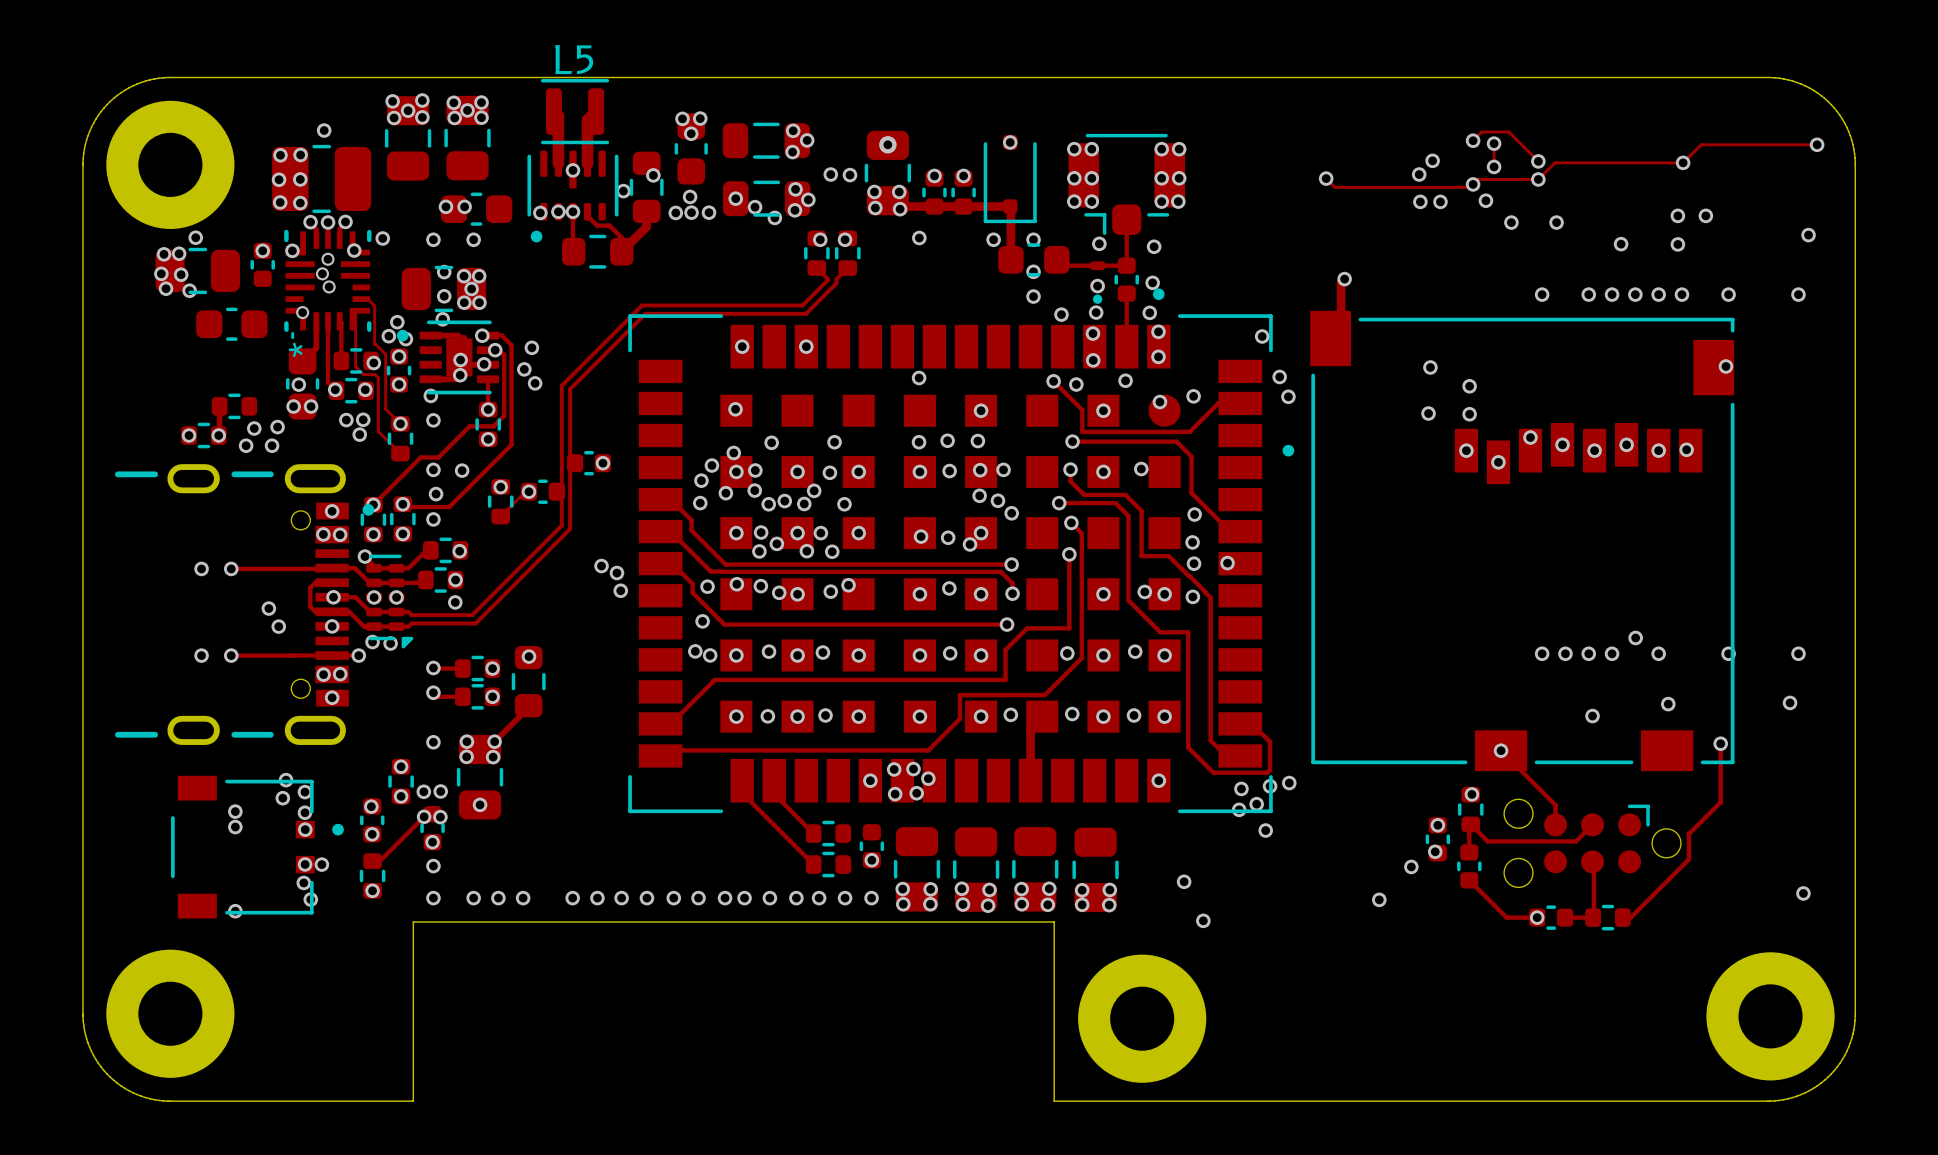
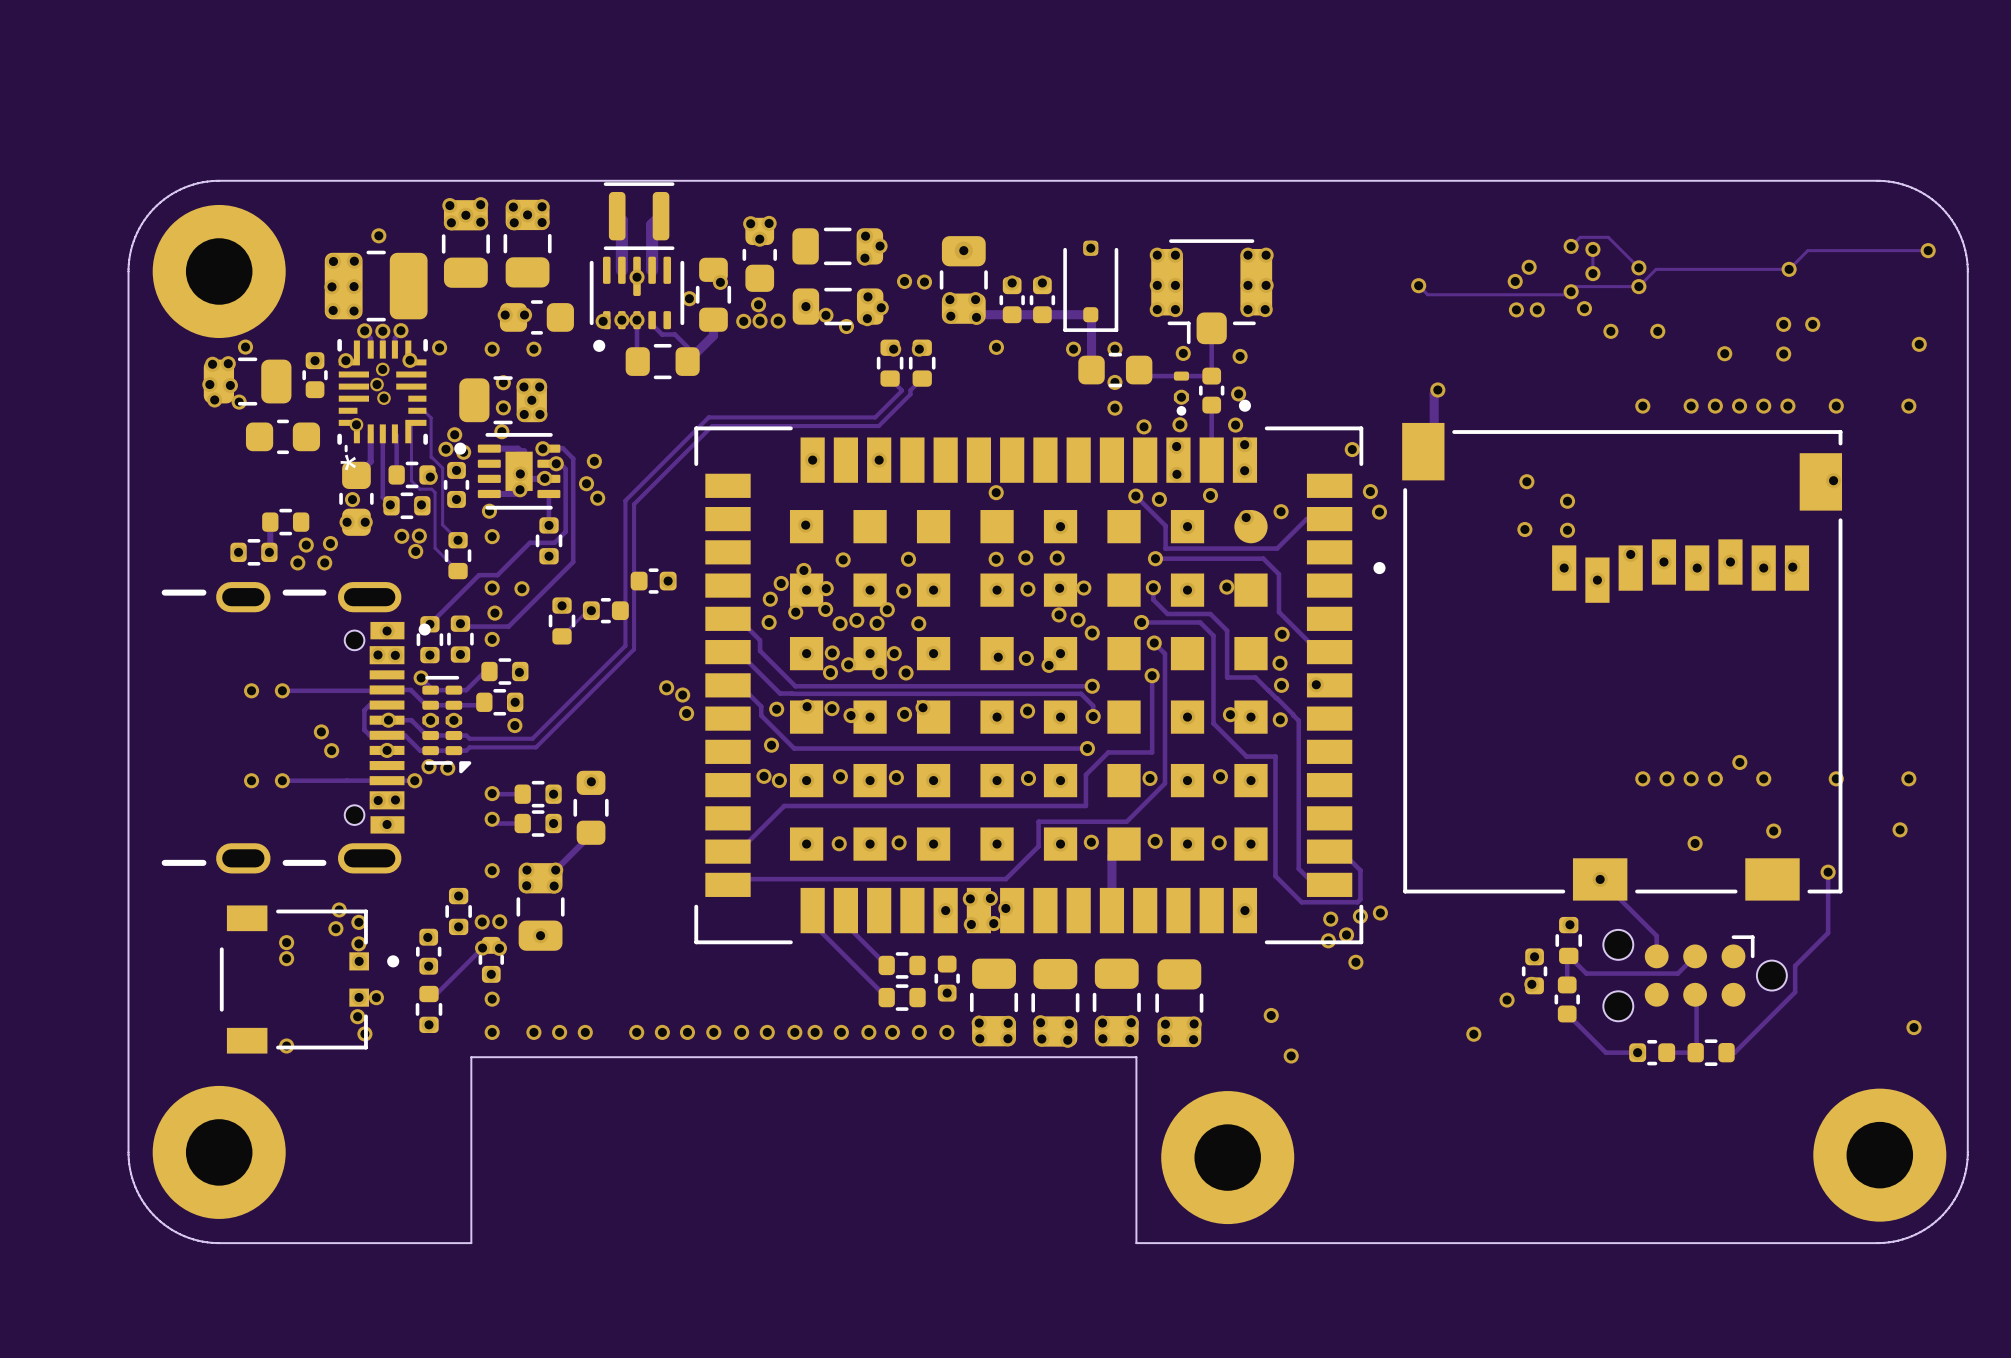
L5 name: L5 (574, 59) -> none

